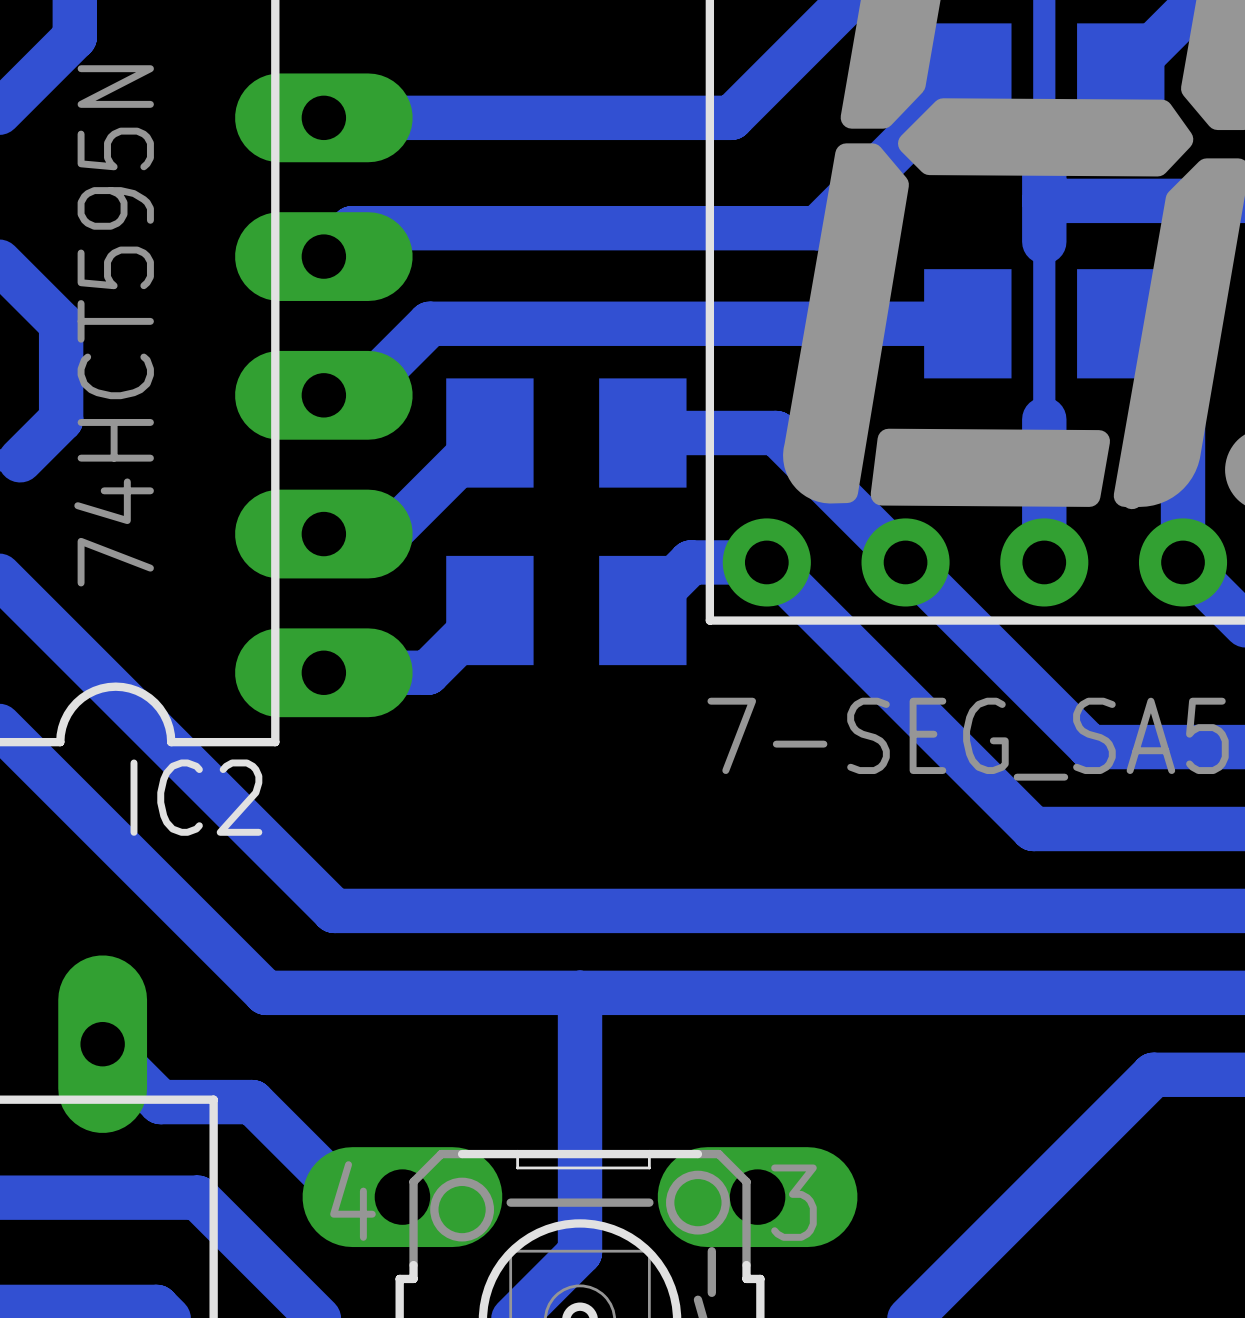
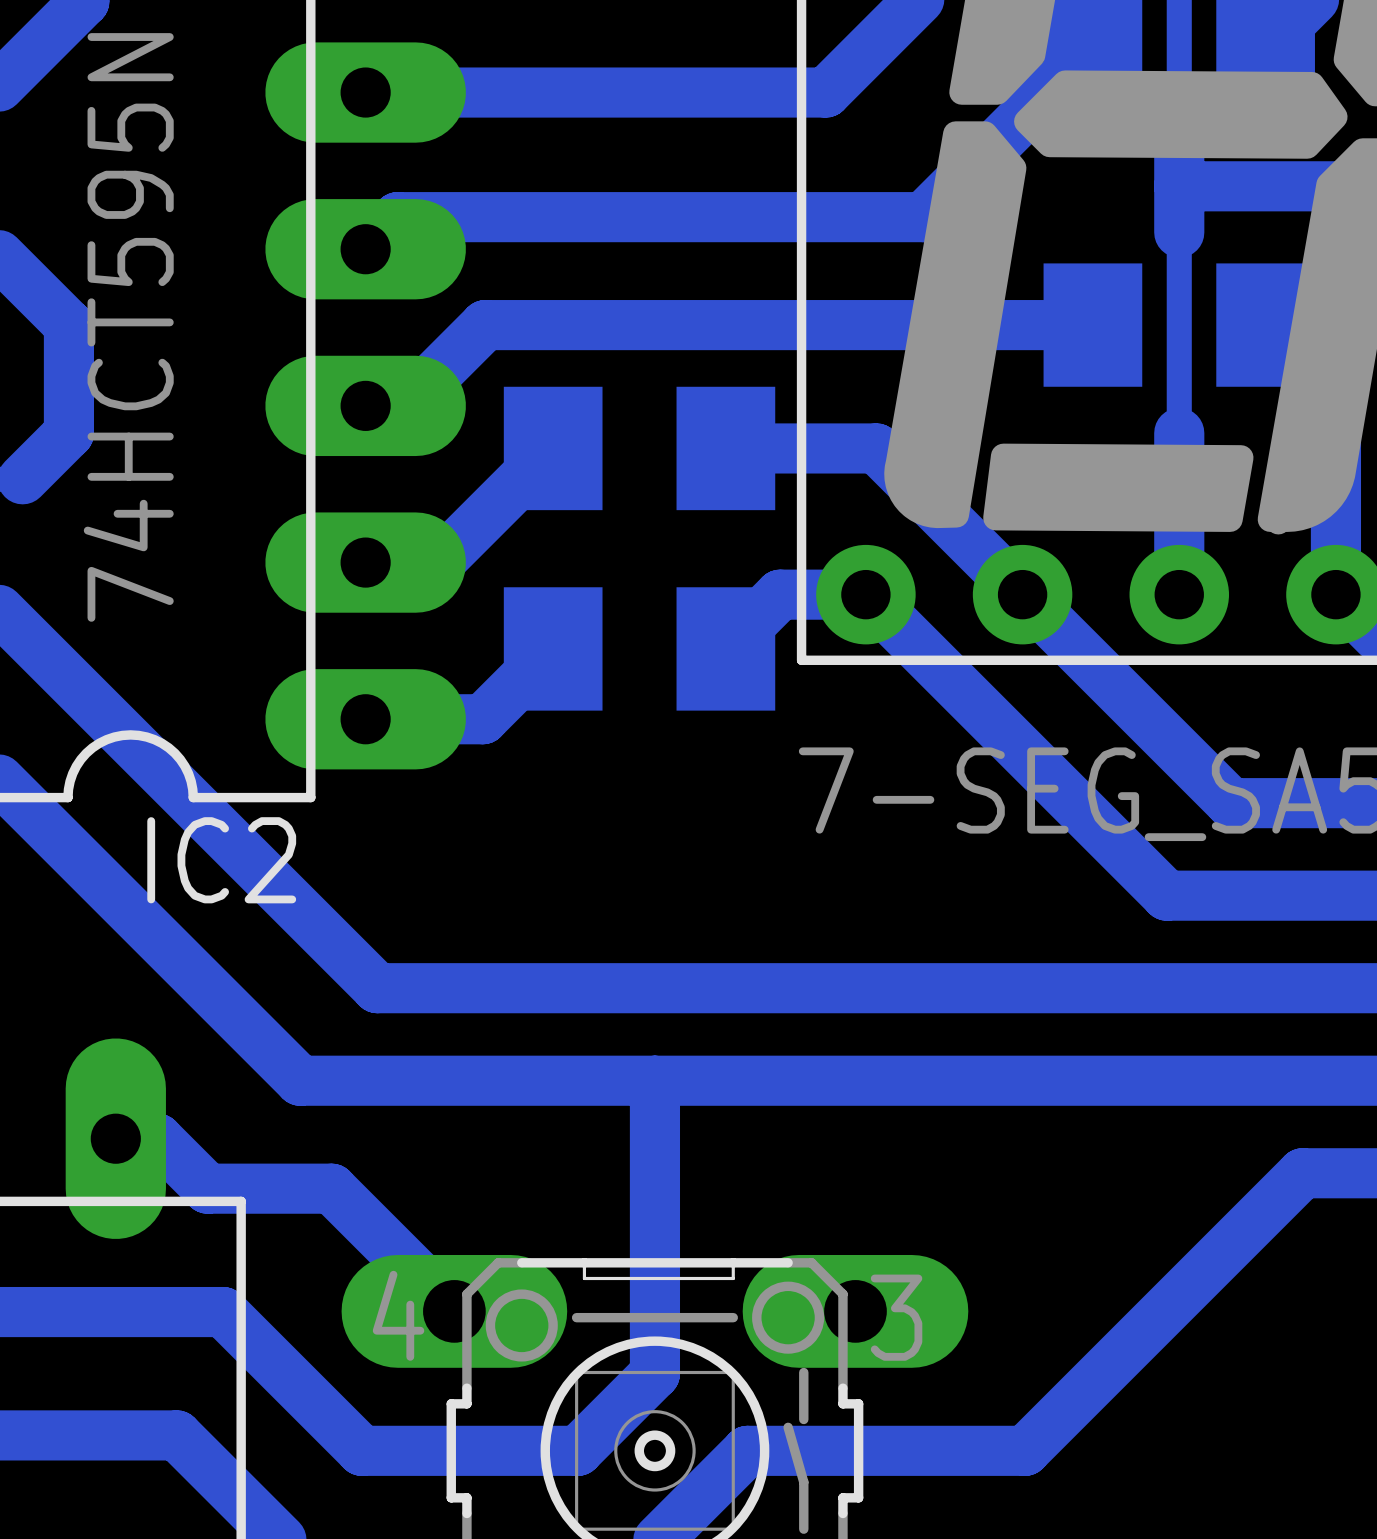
bottom track: (102, 1044) (160, 1102) (252, 1102) (347, 1197) (402, 1197) -> (115, 1138) (157, 1138) (207, 1188) (331, 1188) (454, 1311)

